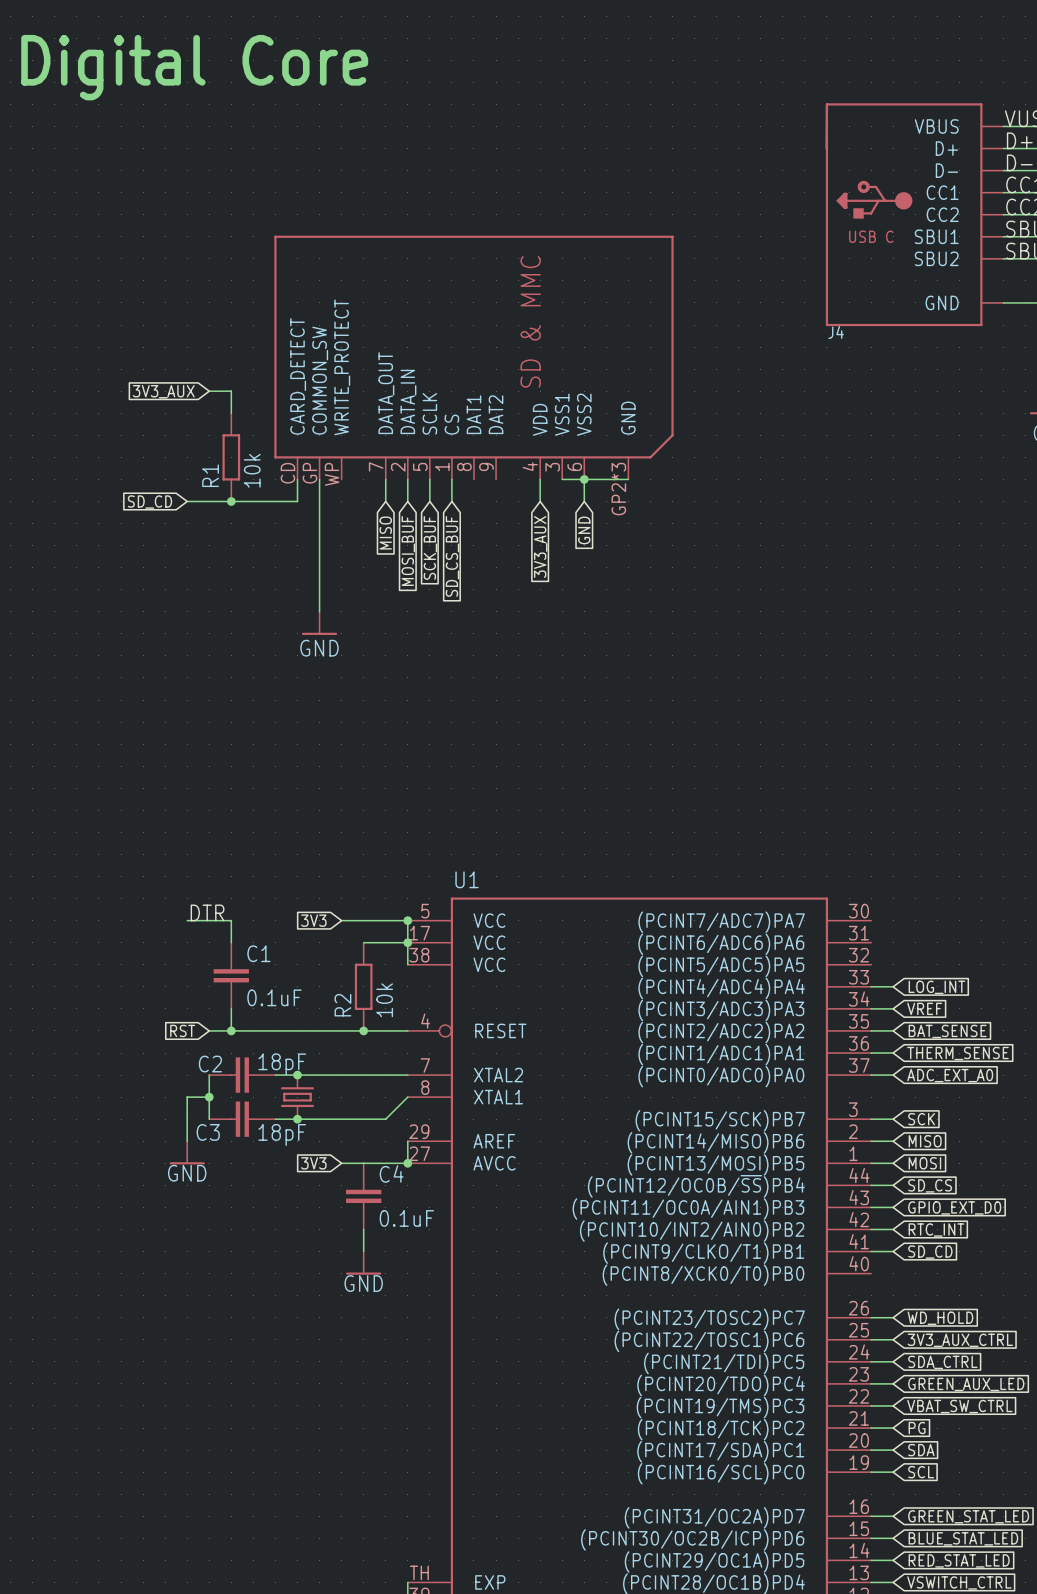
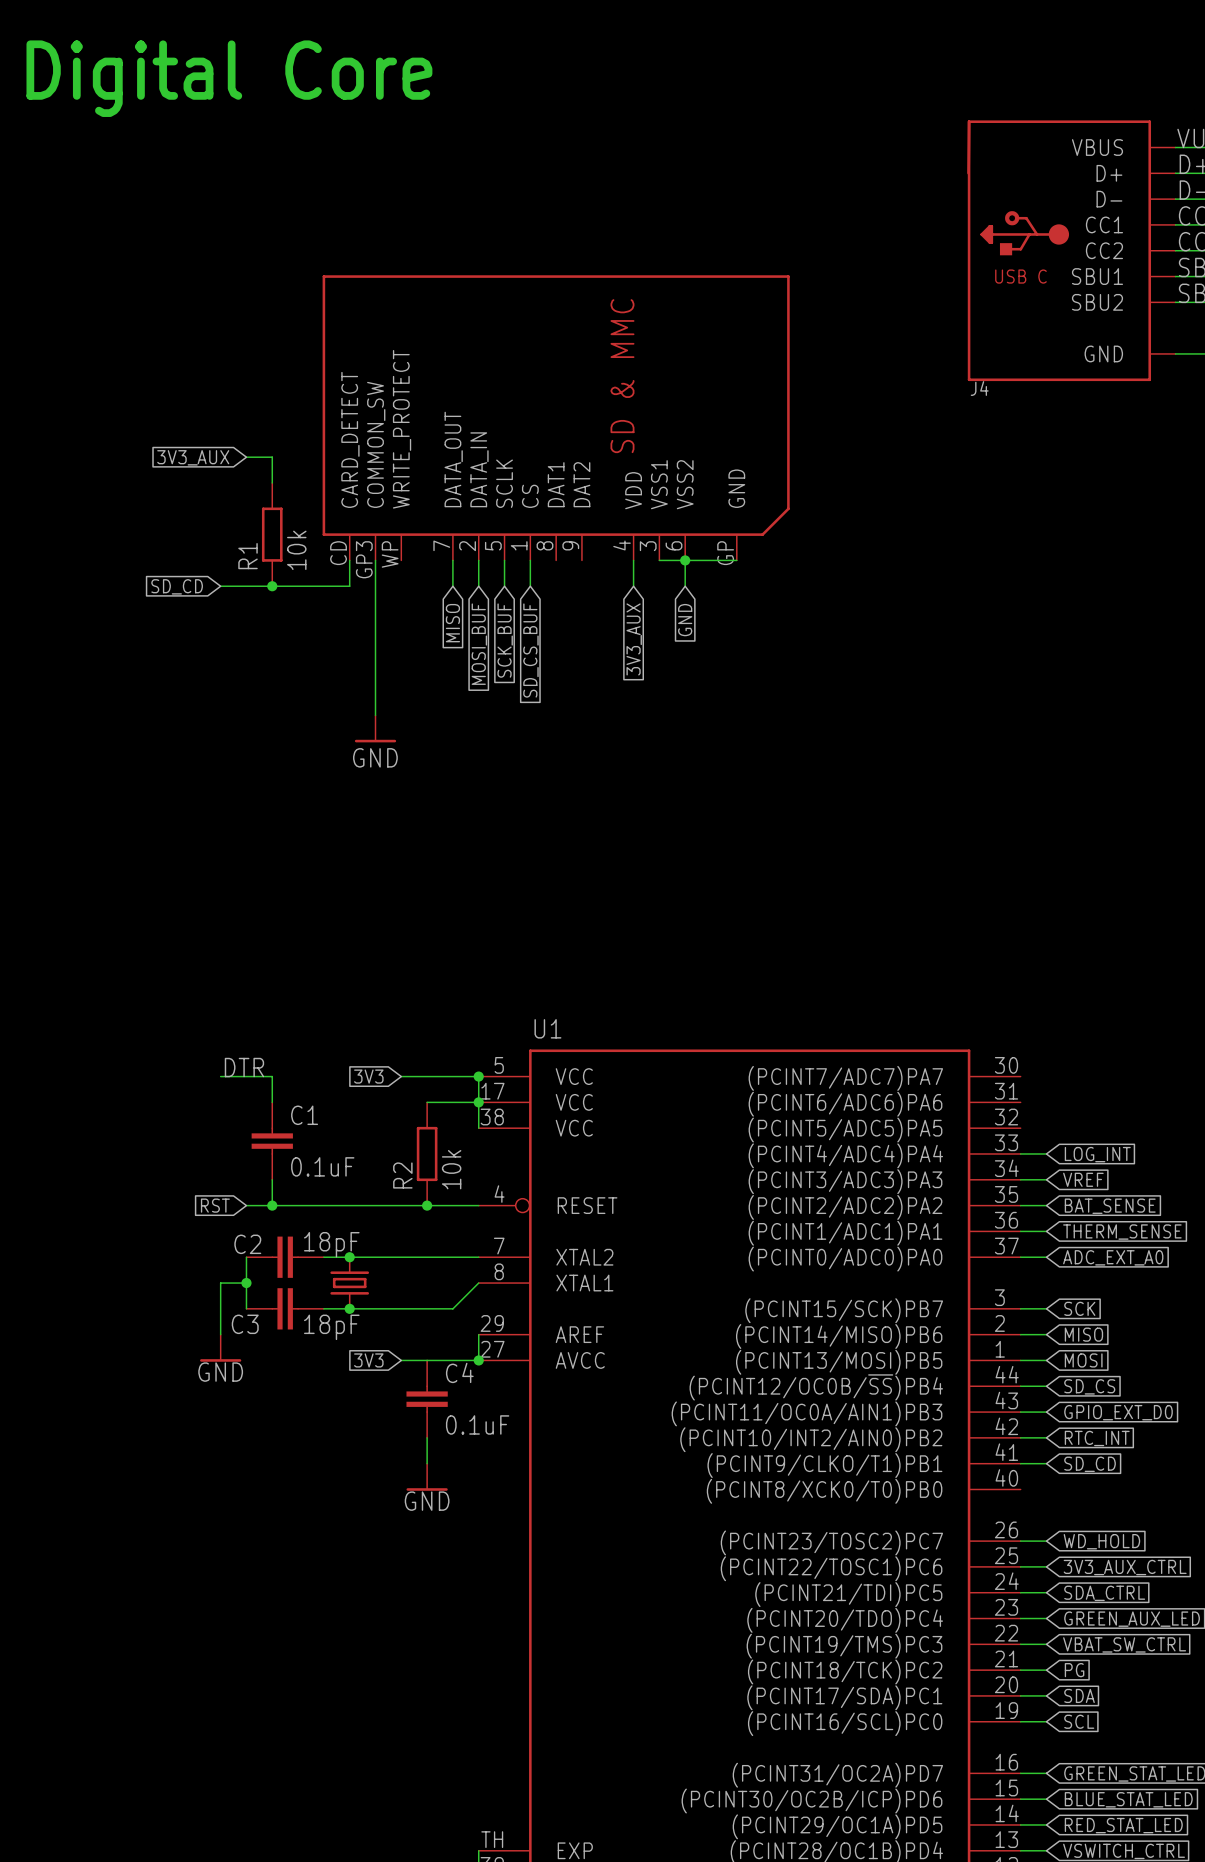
part pin number: GP (310, 473) -> GP3 (364, 559)
part pin number: GP2*3 (618, 489) -> GP (725, 553)

